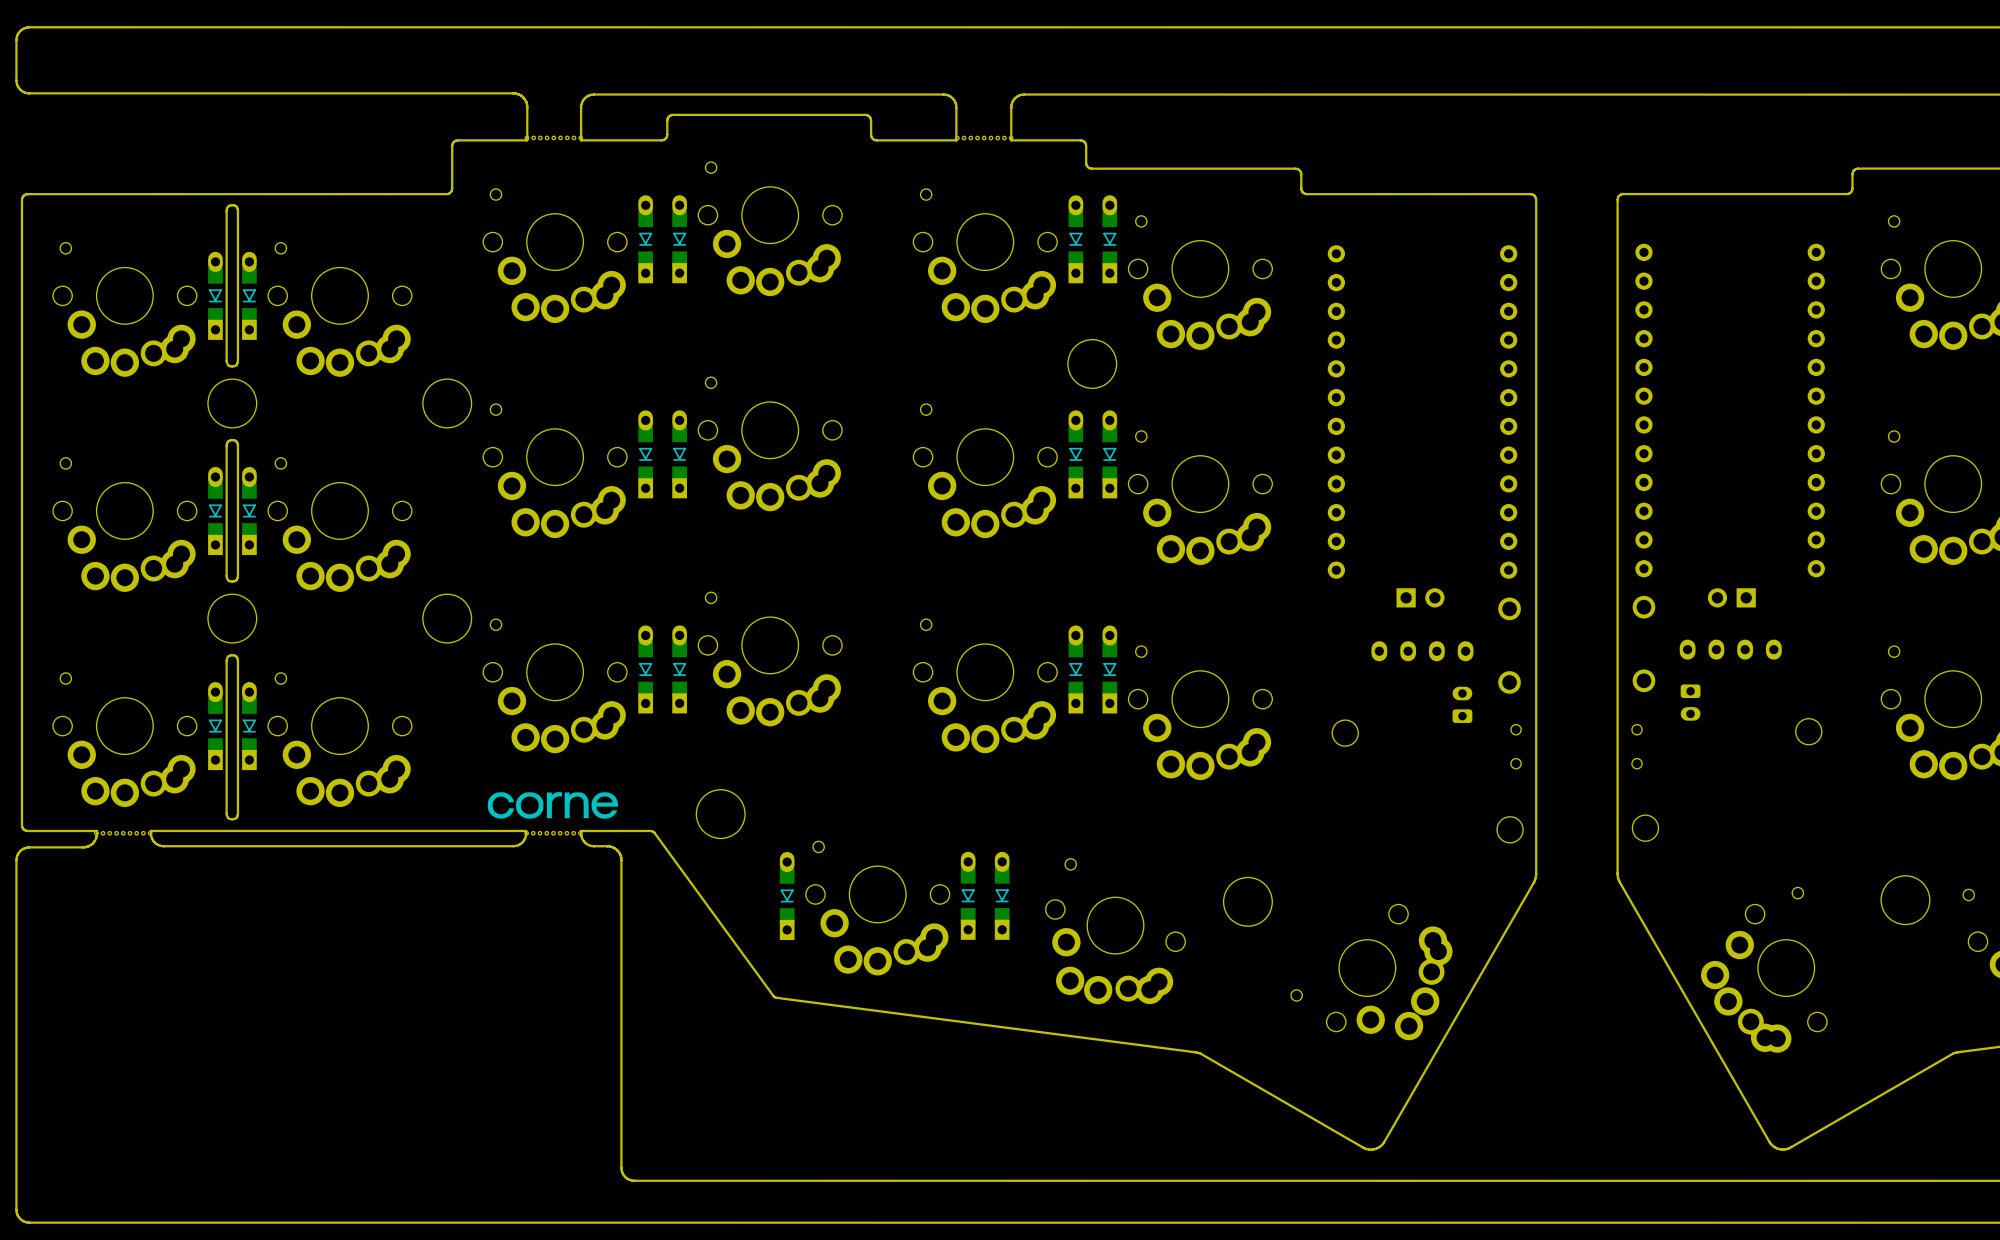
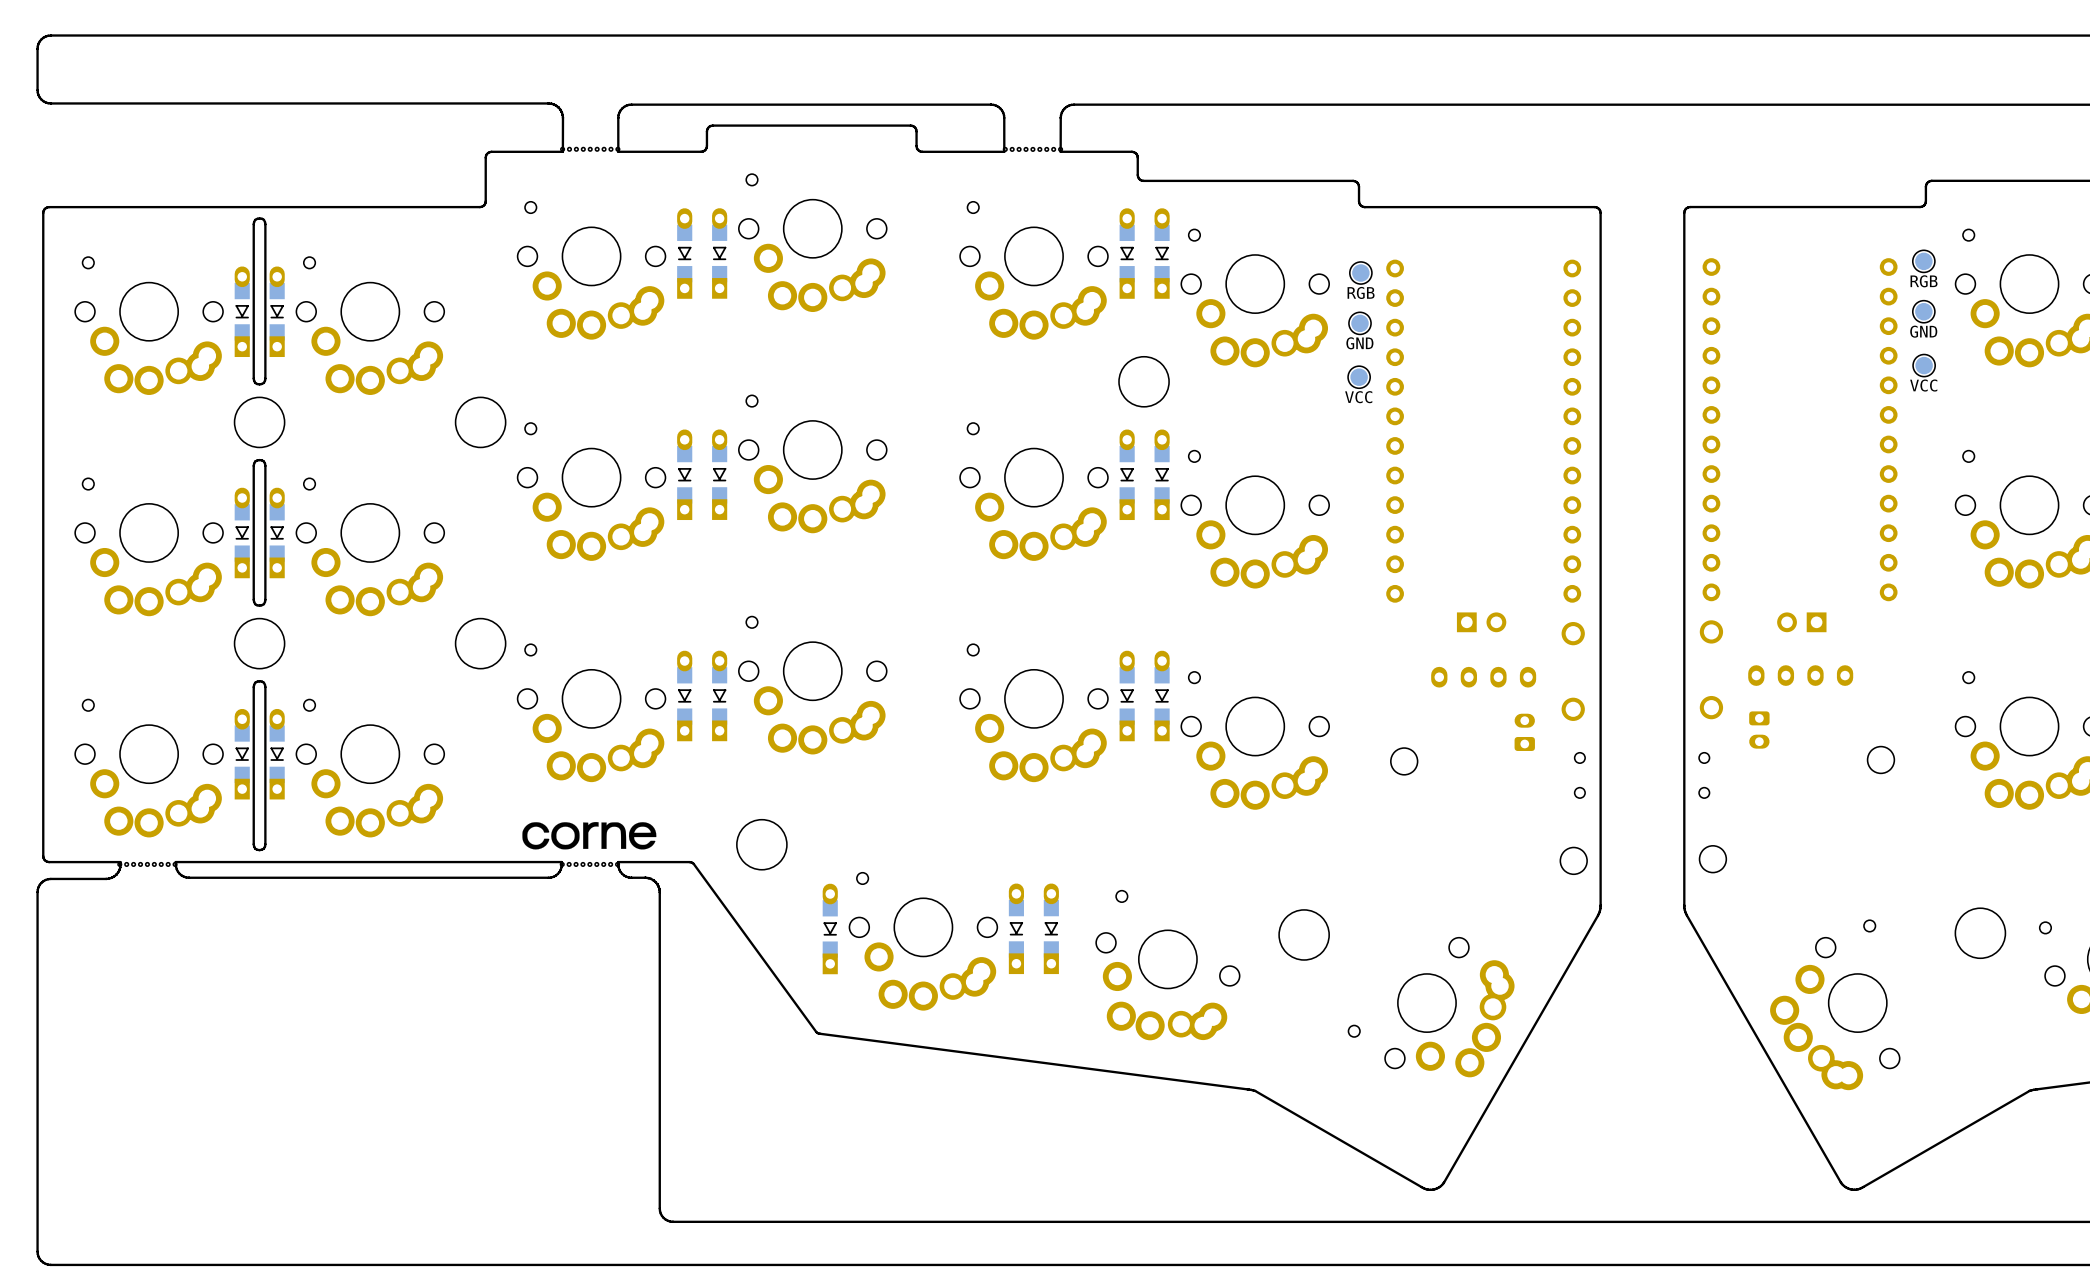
part: none -> RGB (1923, 261)
part: none -> RGB (1360, 273)
part: none -> GND (1923, 311)
part: none -> GND (1360, 323)
part: none -> VCC (1924, 365)
part: none -> VCC (1359, 377)

